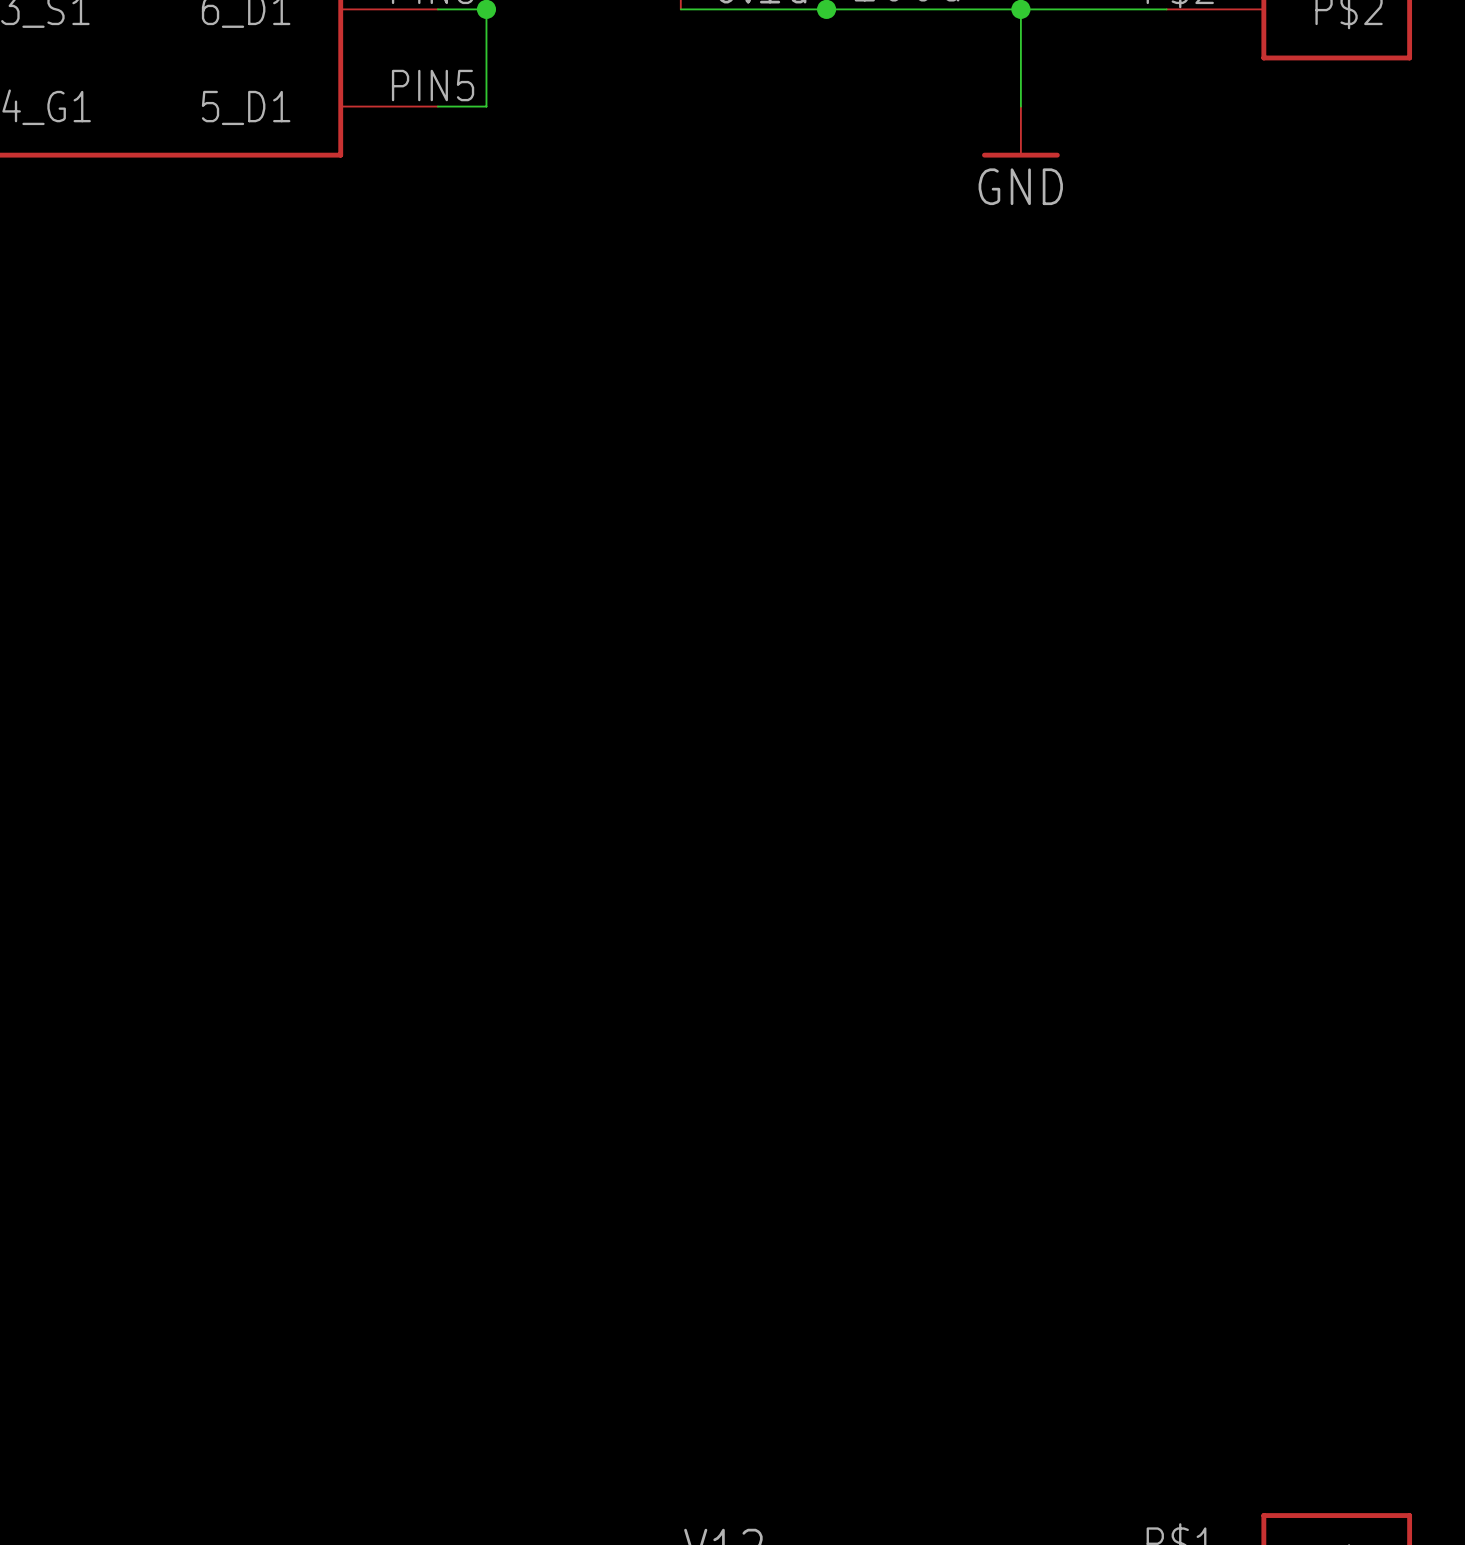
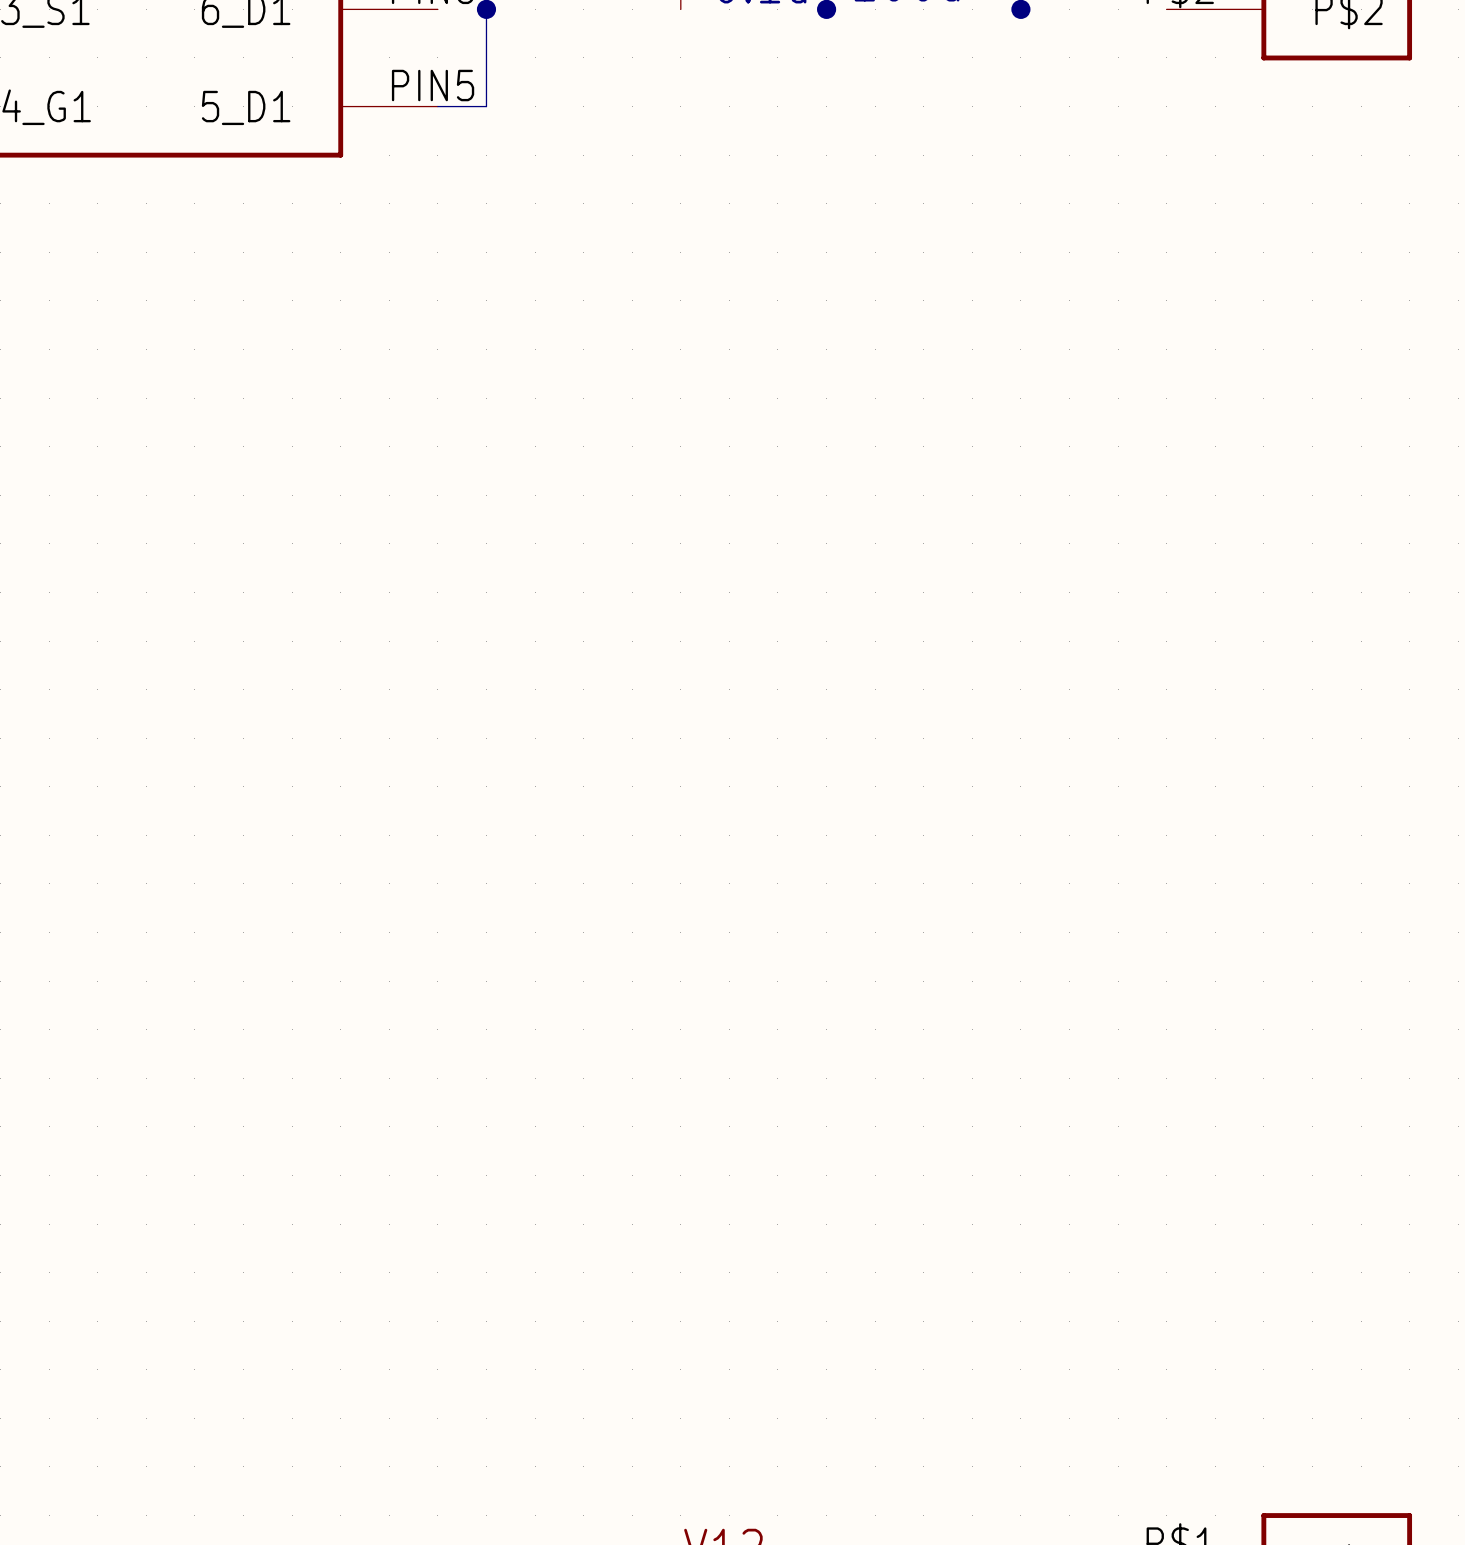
wire: (437, 9) (486, 9) -> none
wire: (680, 9) (1166, 9) -> none
wire: (1020, 9) (1020, 106) -> none
power symbol: GND (1020, 132) -> none

